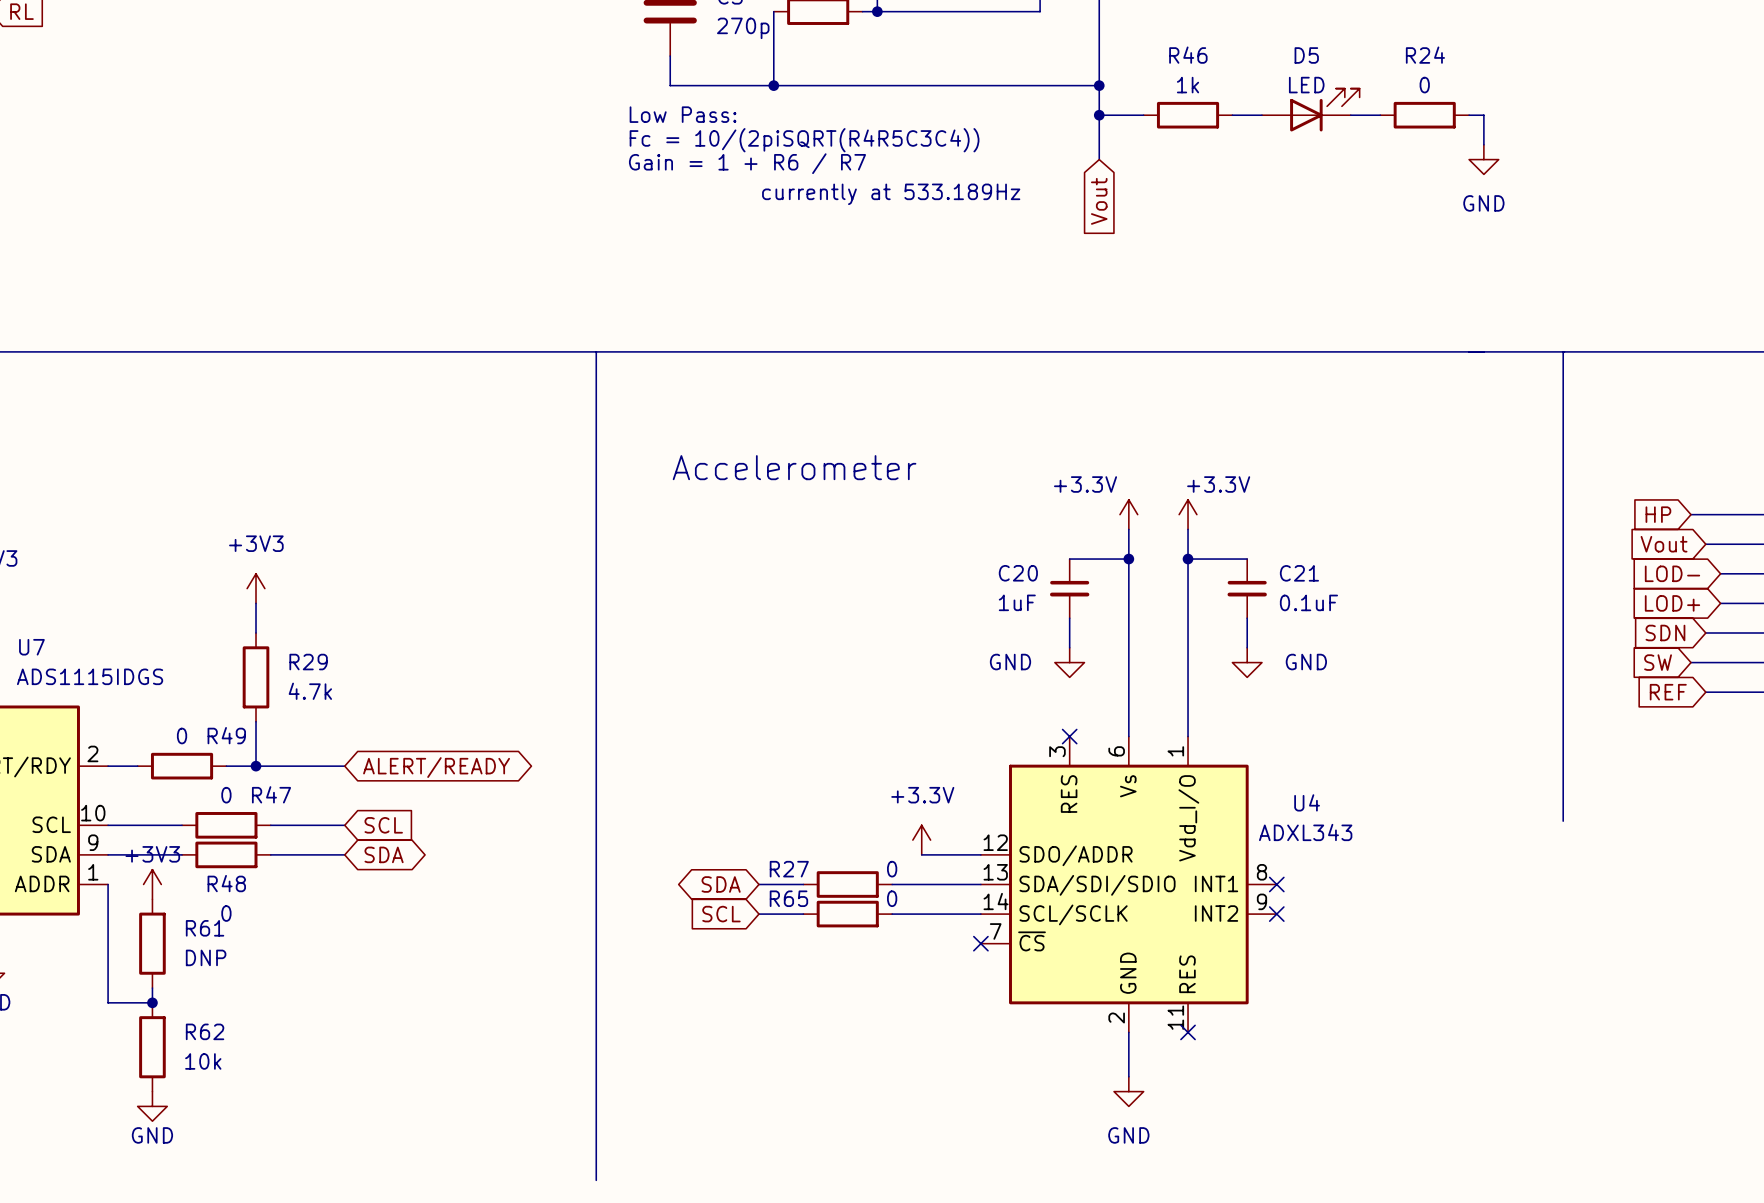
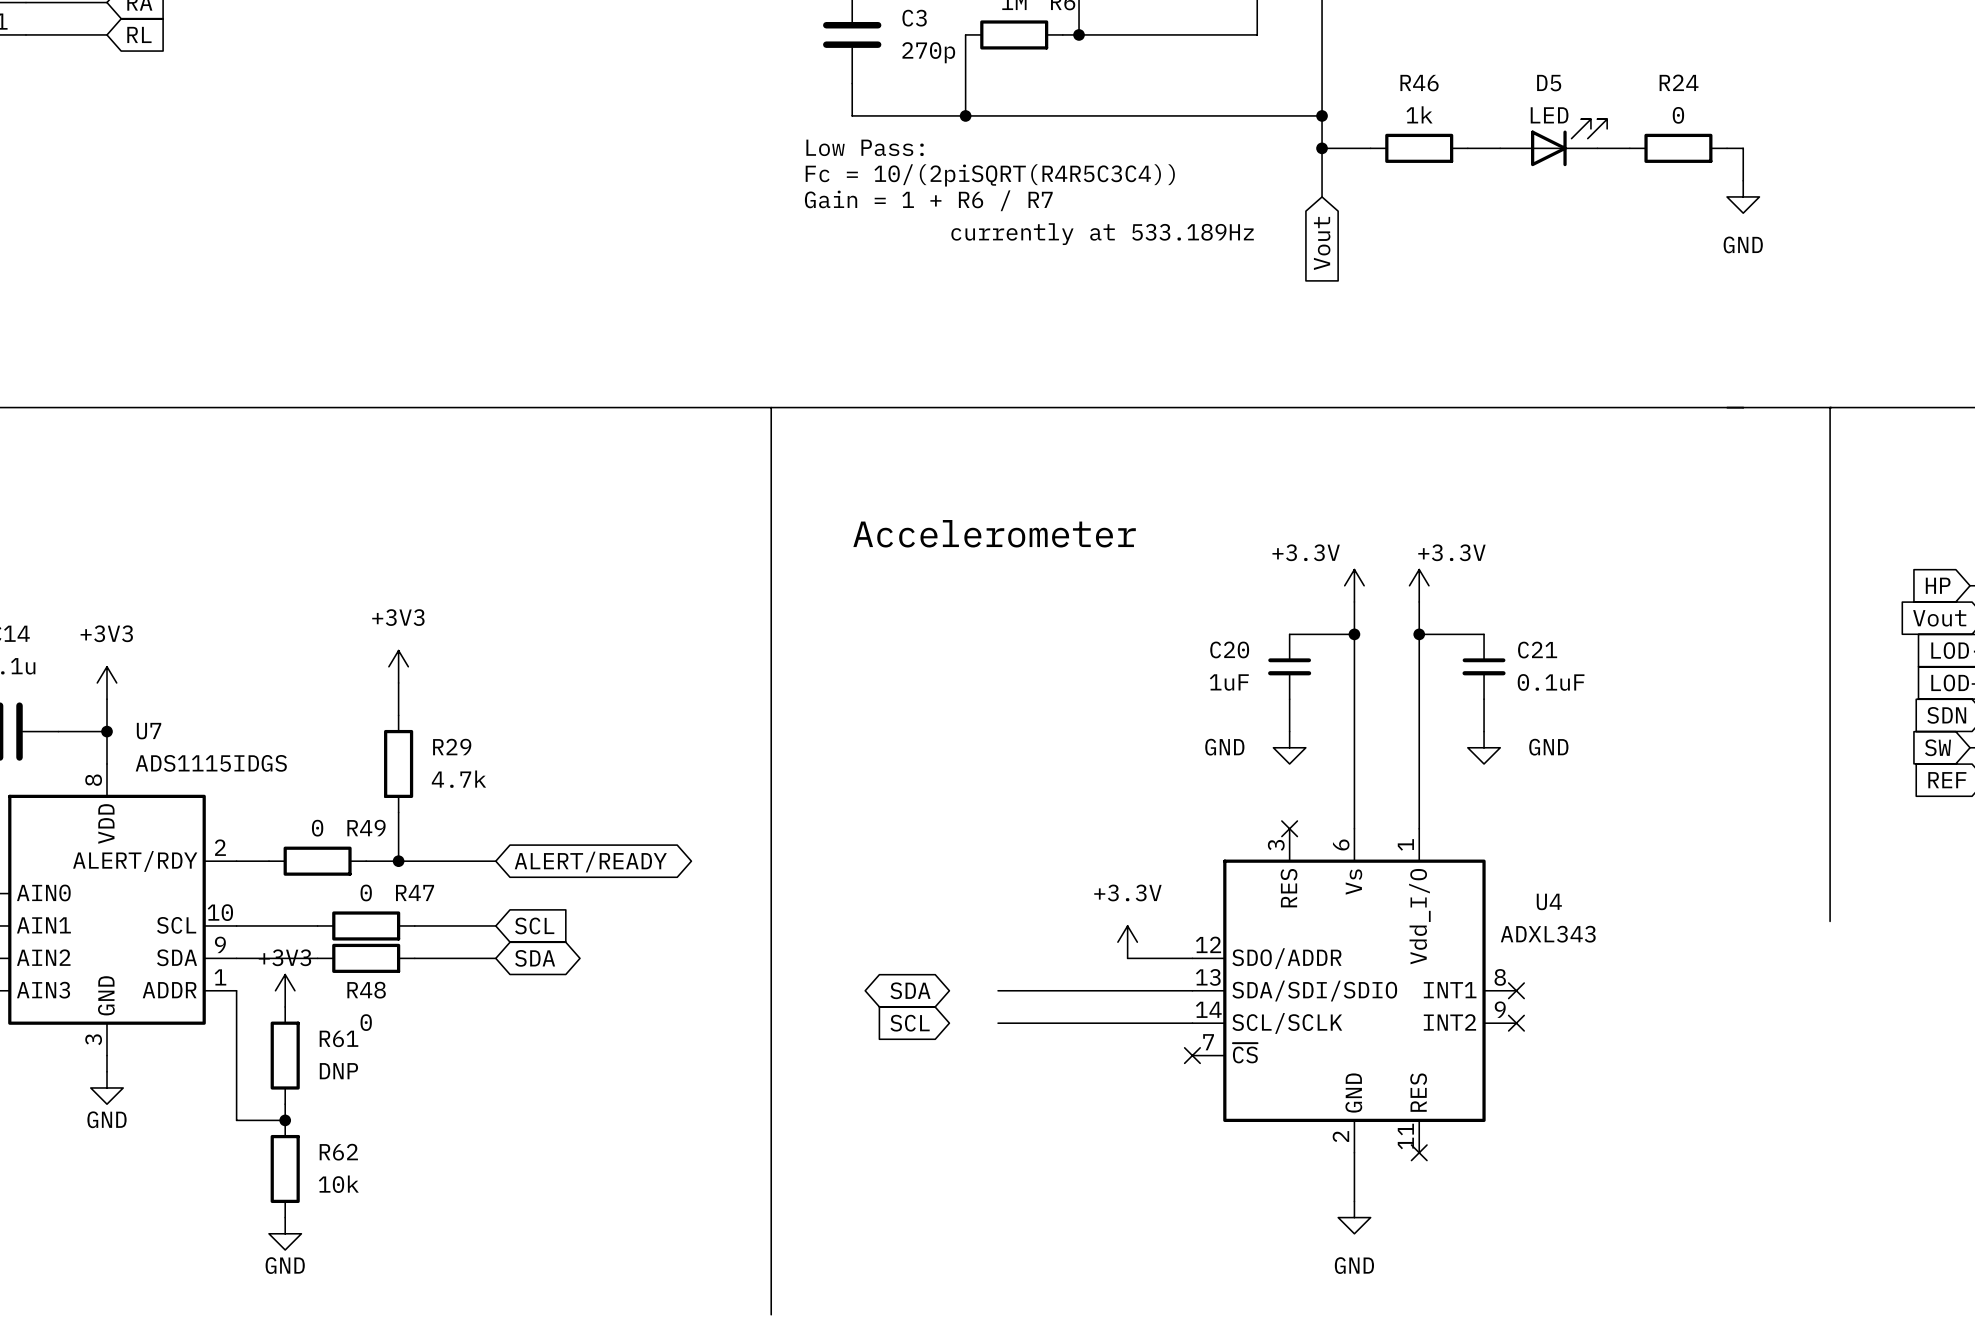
wire: (758, 884) (803, 884) -> (1095, 990) (998, 990)
R27: 0 (847, 884) -> none
wire: (758, 914) (803, 914) -> (1095, 1023) (998, 1023)
R65: 0 (847, 914) -> none

